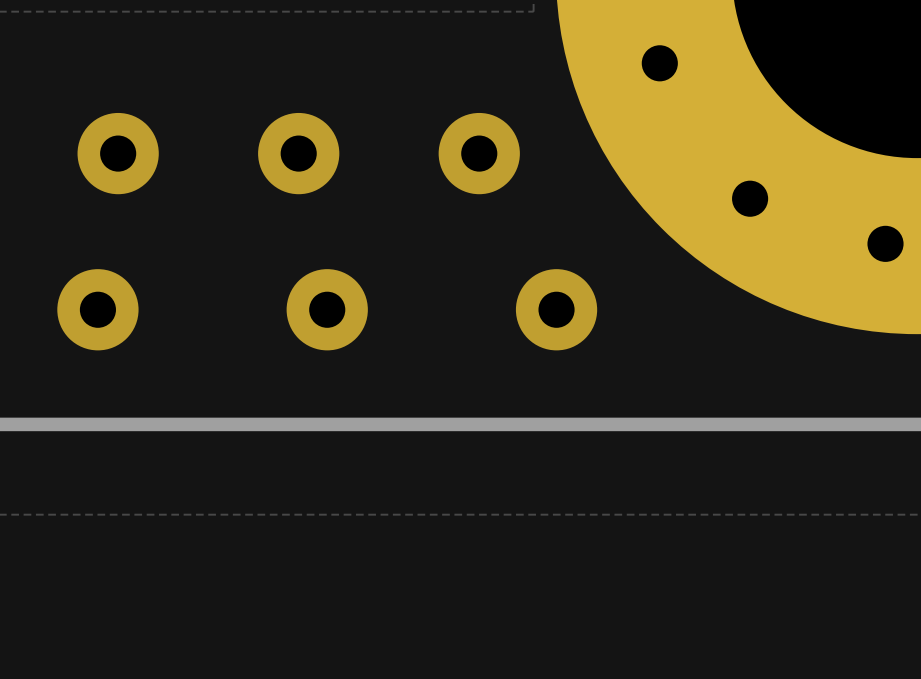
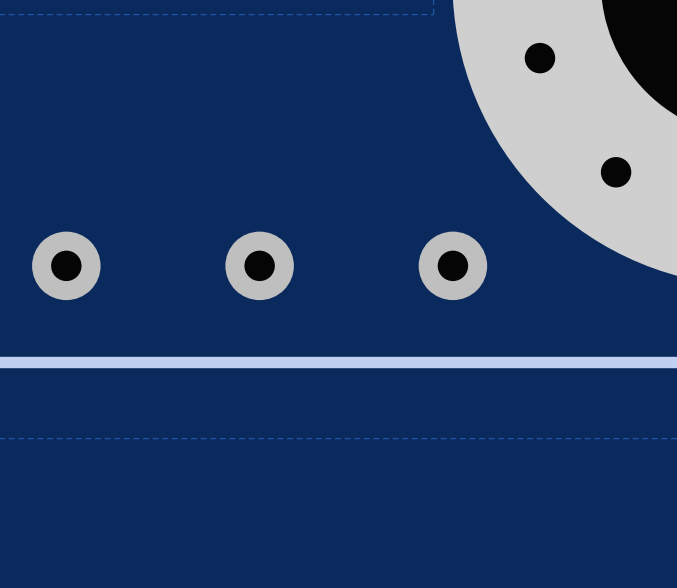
via: (118, 153) -> none
via: (298, 153) -> none
via: (479, 153) -> none

